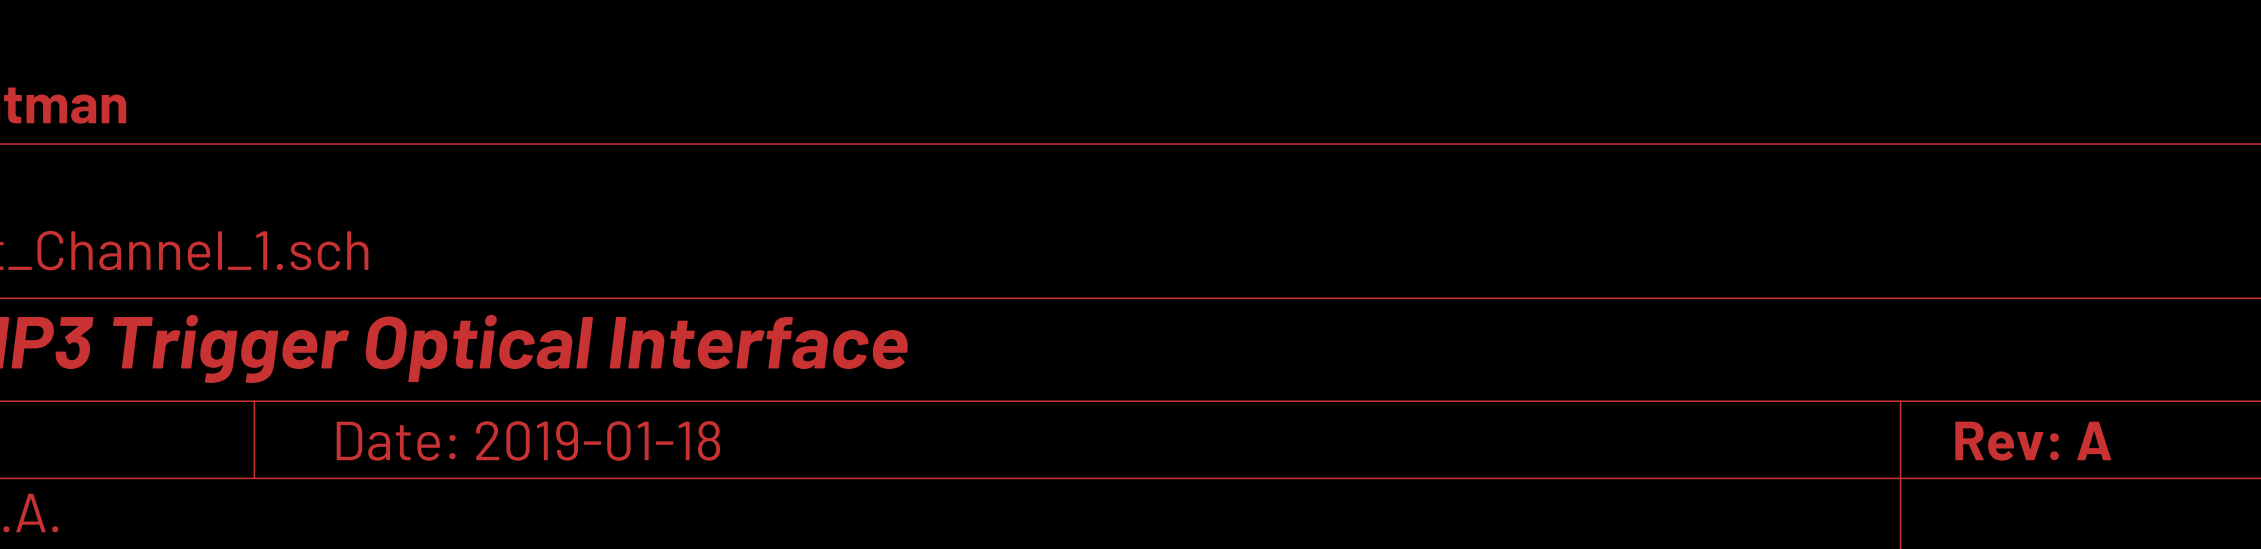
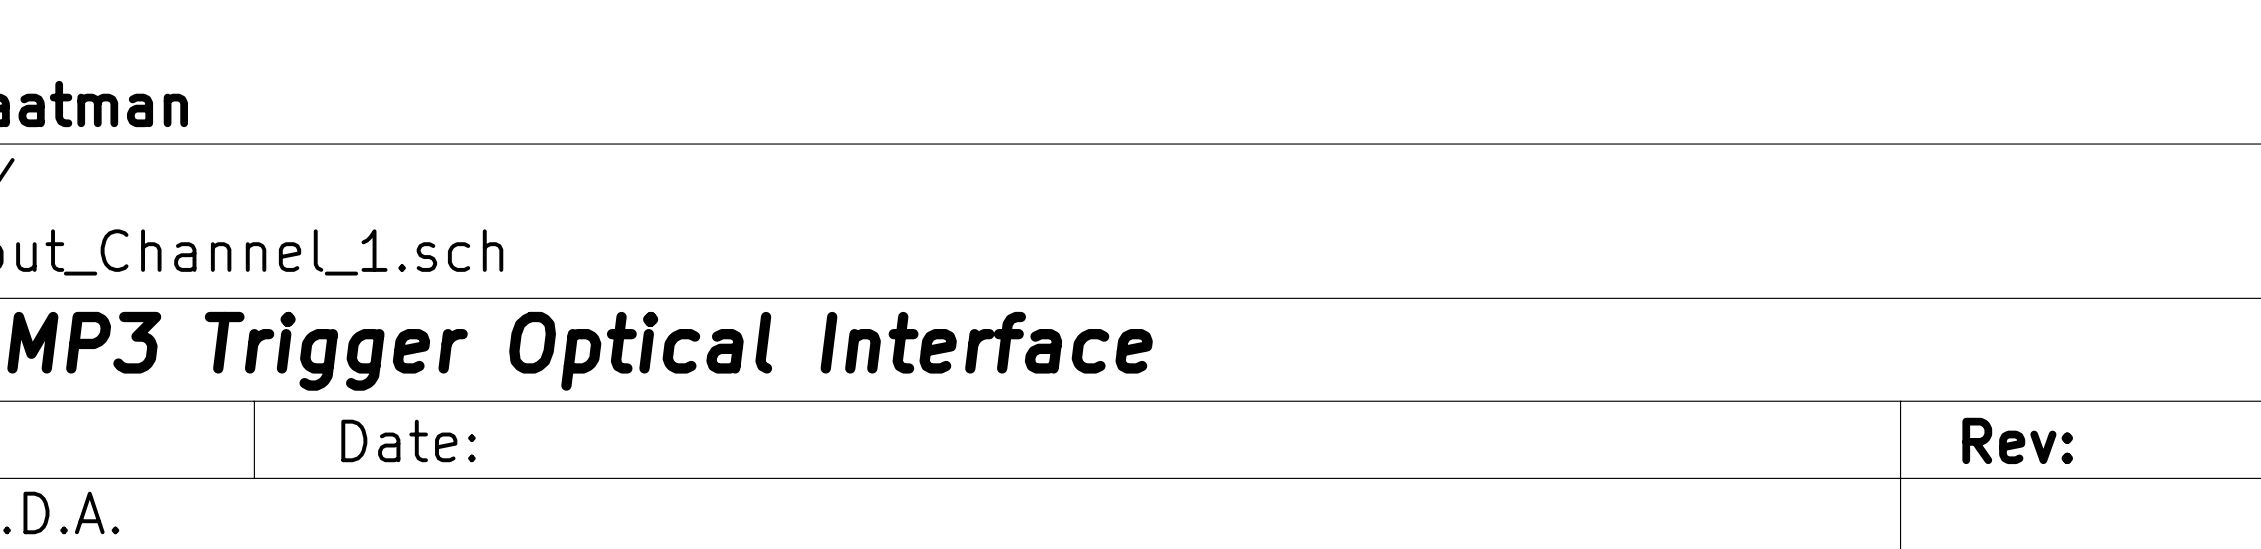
title block: Date: 2019-01-18 (528, 440) -> Date: (408, 440)
title block: Rev: A (2033, 441) -> Rev: (2017, 440)

